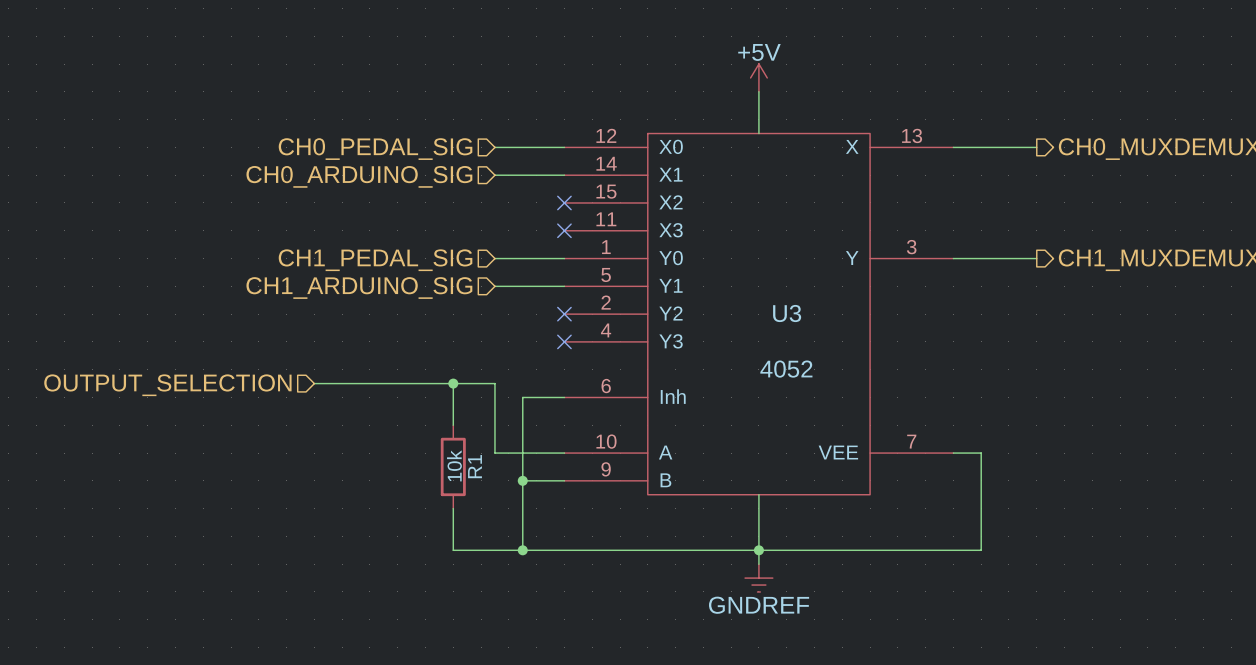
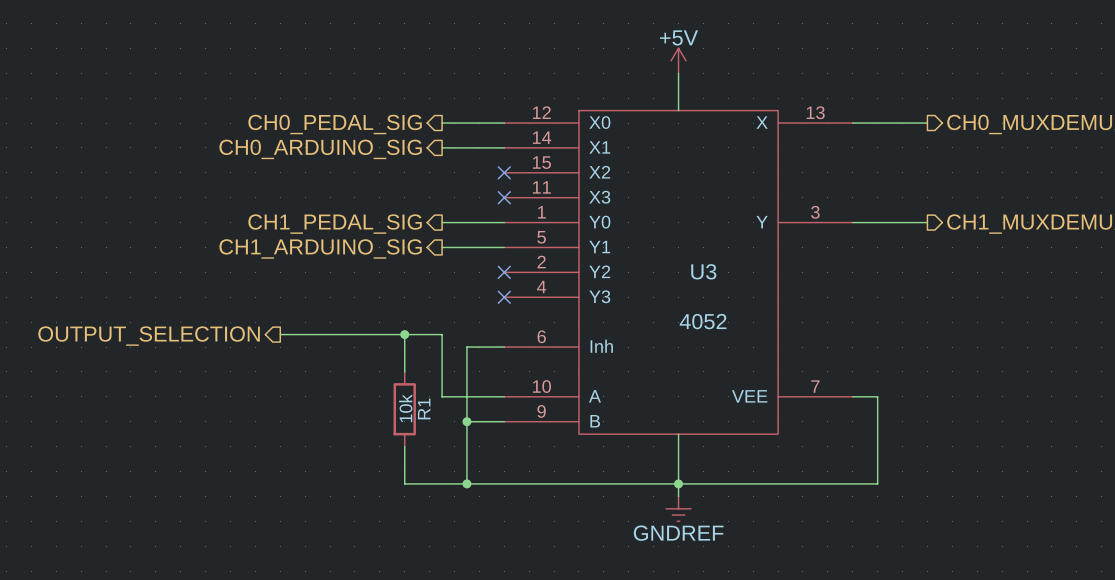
hierarchical label shape: input (375, 149) -> output (335, 124)
hierarchical label shape: input (359, 176) -> output (320, 149)
hierarchical label shape: input (375, 260) -> output (335, 224)
hierarchical label shape: input (359, 288) -> output (320, 248)
hierarchical label shape: input (167, 385) -> output (149, 336)

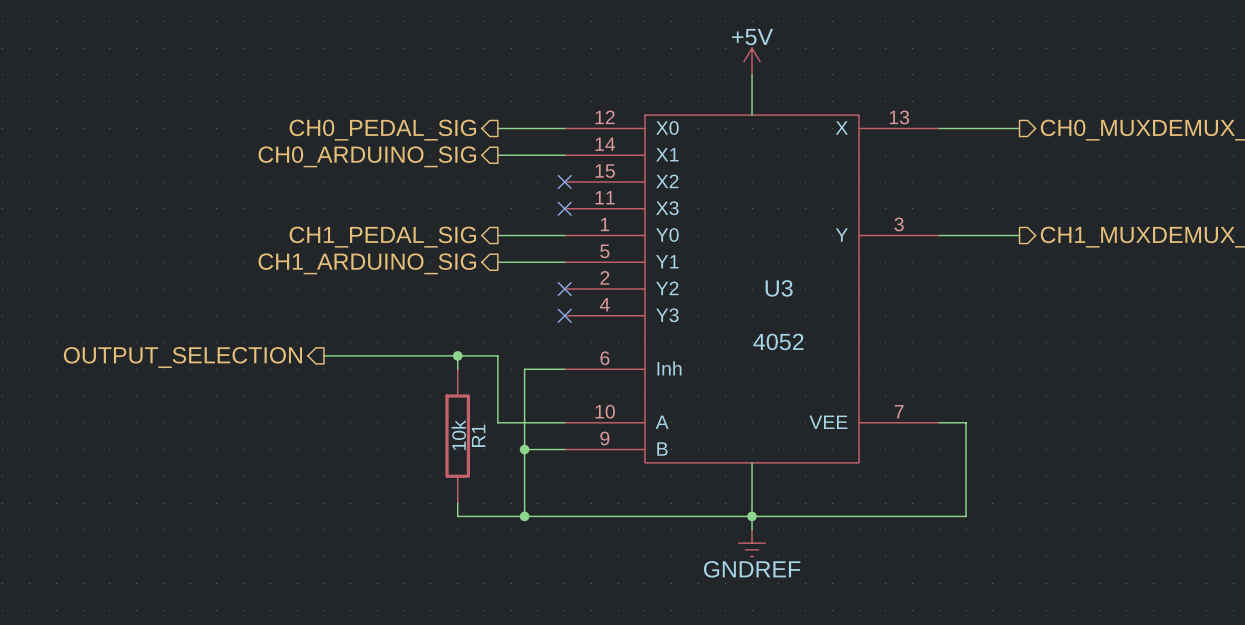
R1 symbol: [393, 371, 416, 447] -> [445, 369, 471, 504]

